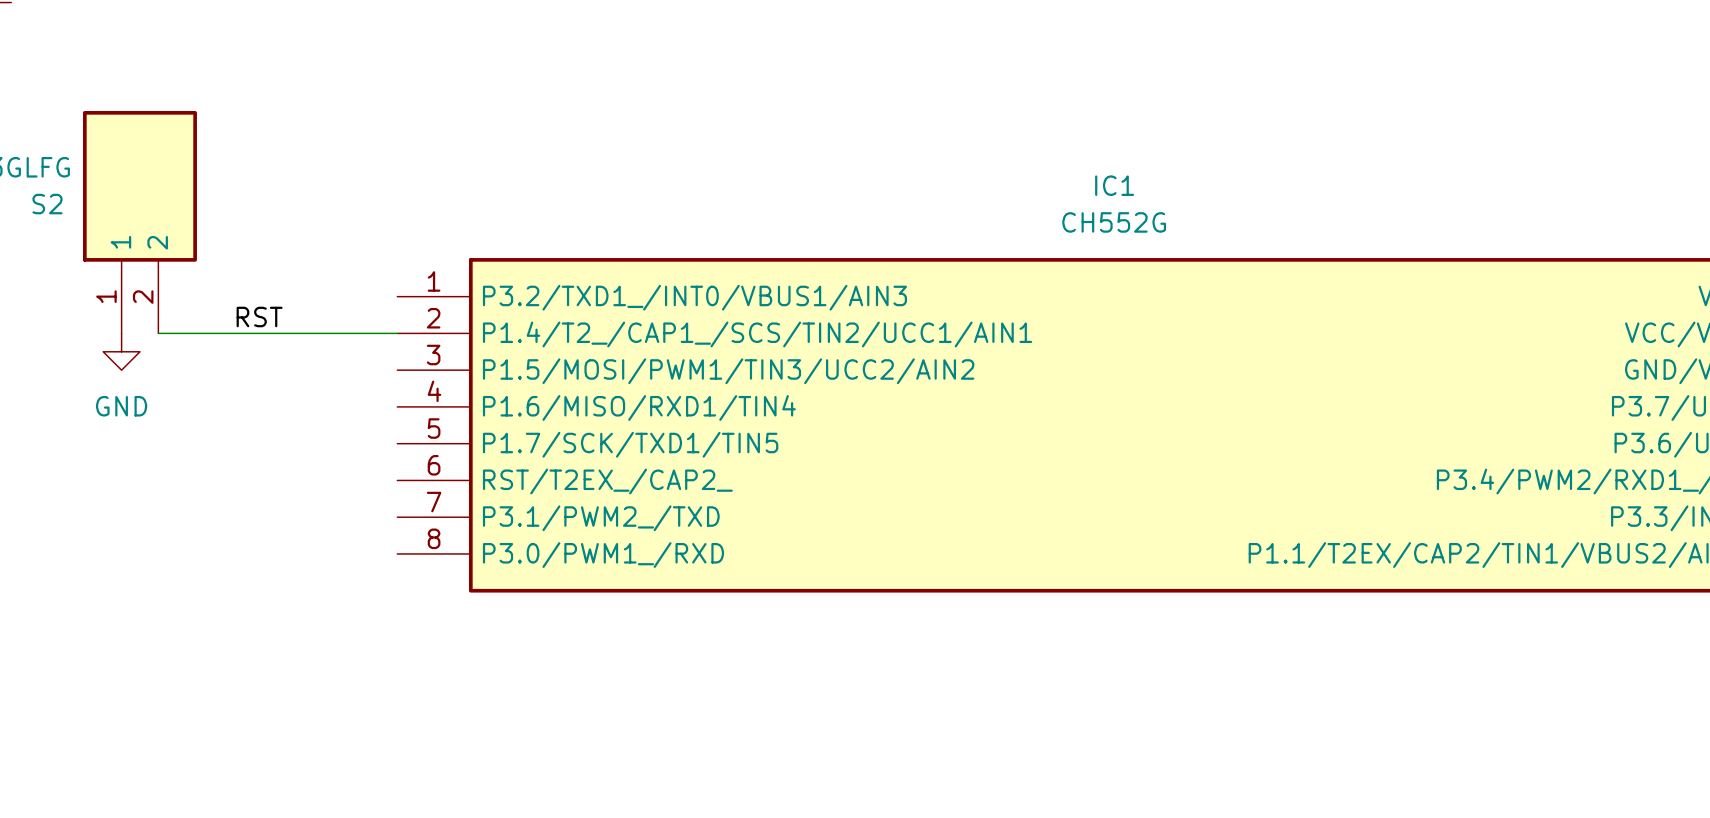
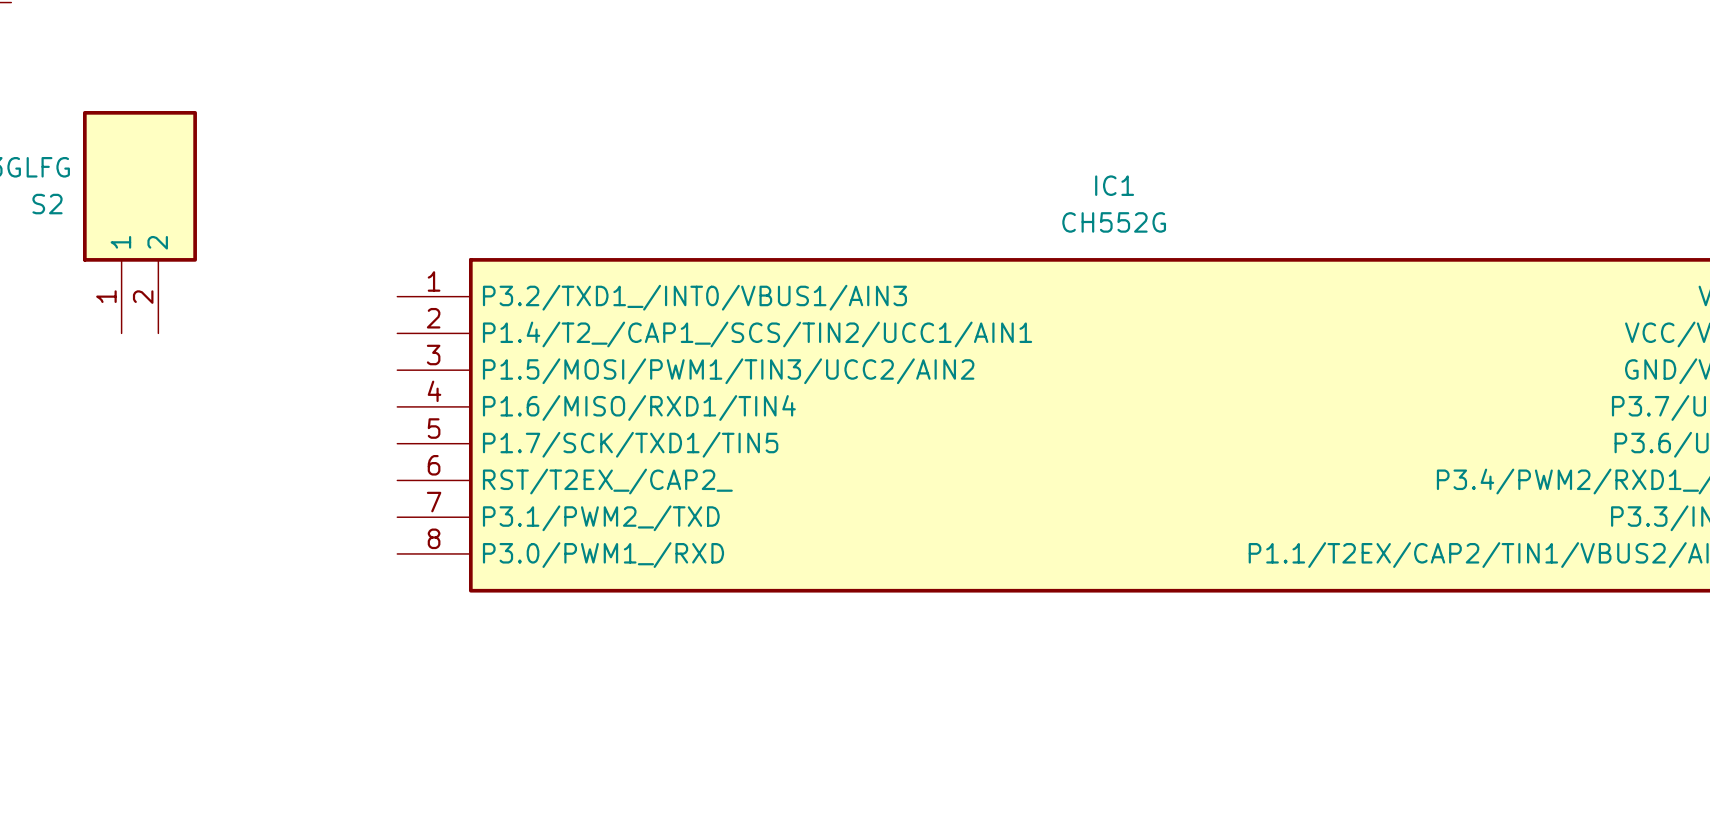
label: RST (259, 317) -> none
wire: (158, 333) (397, 333) -> none
power symbol: GND (121, 351) -> none

